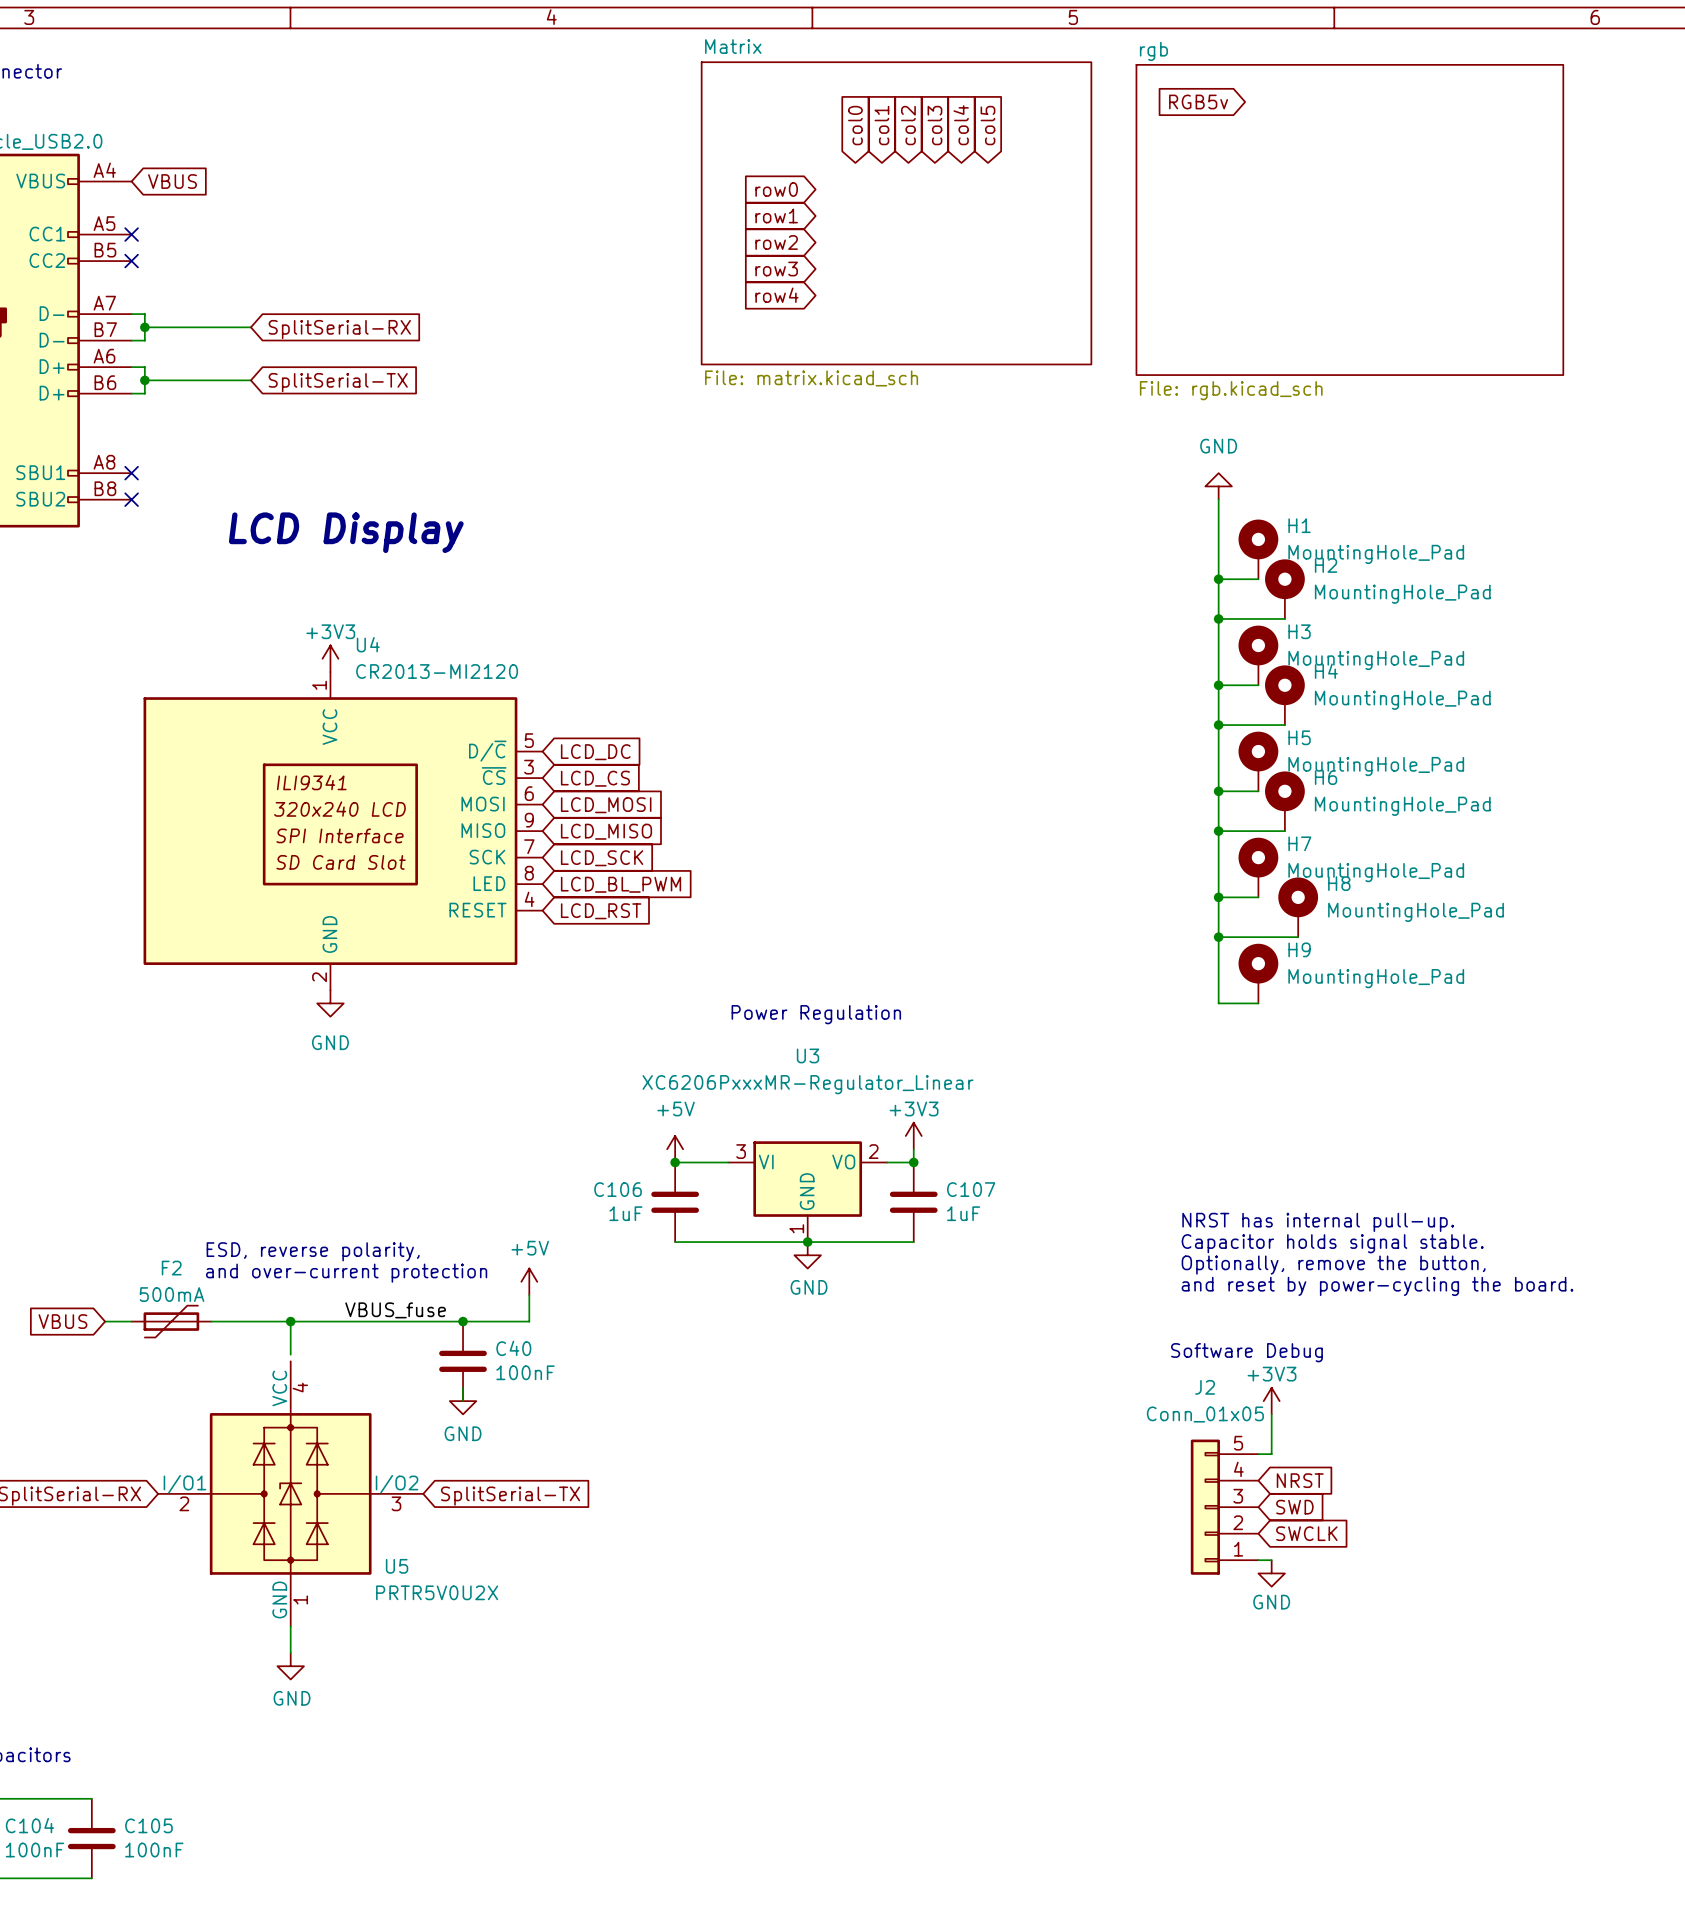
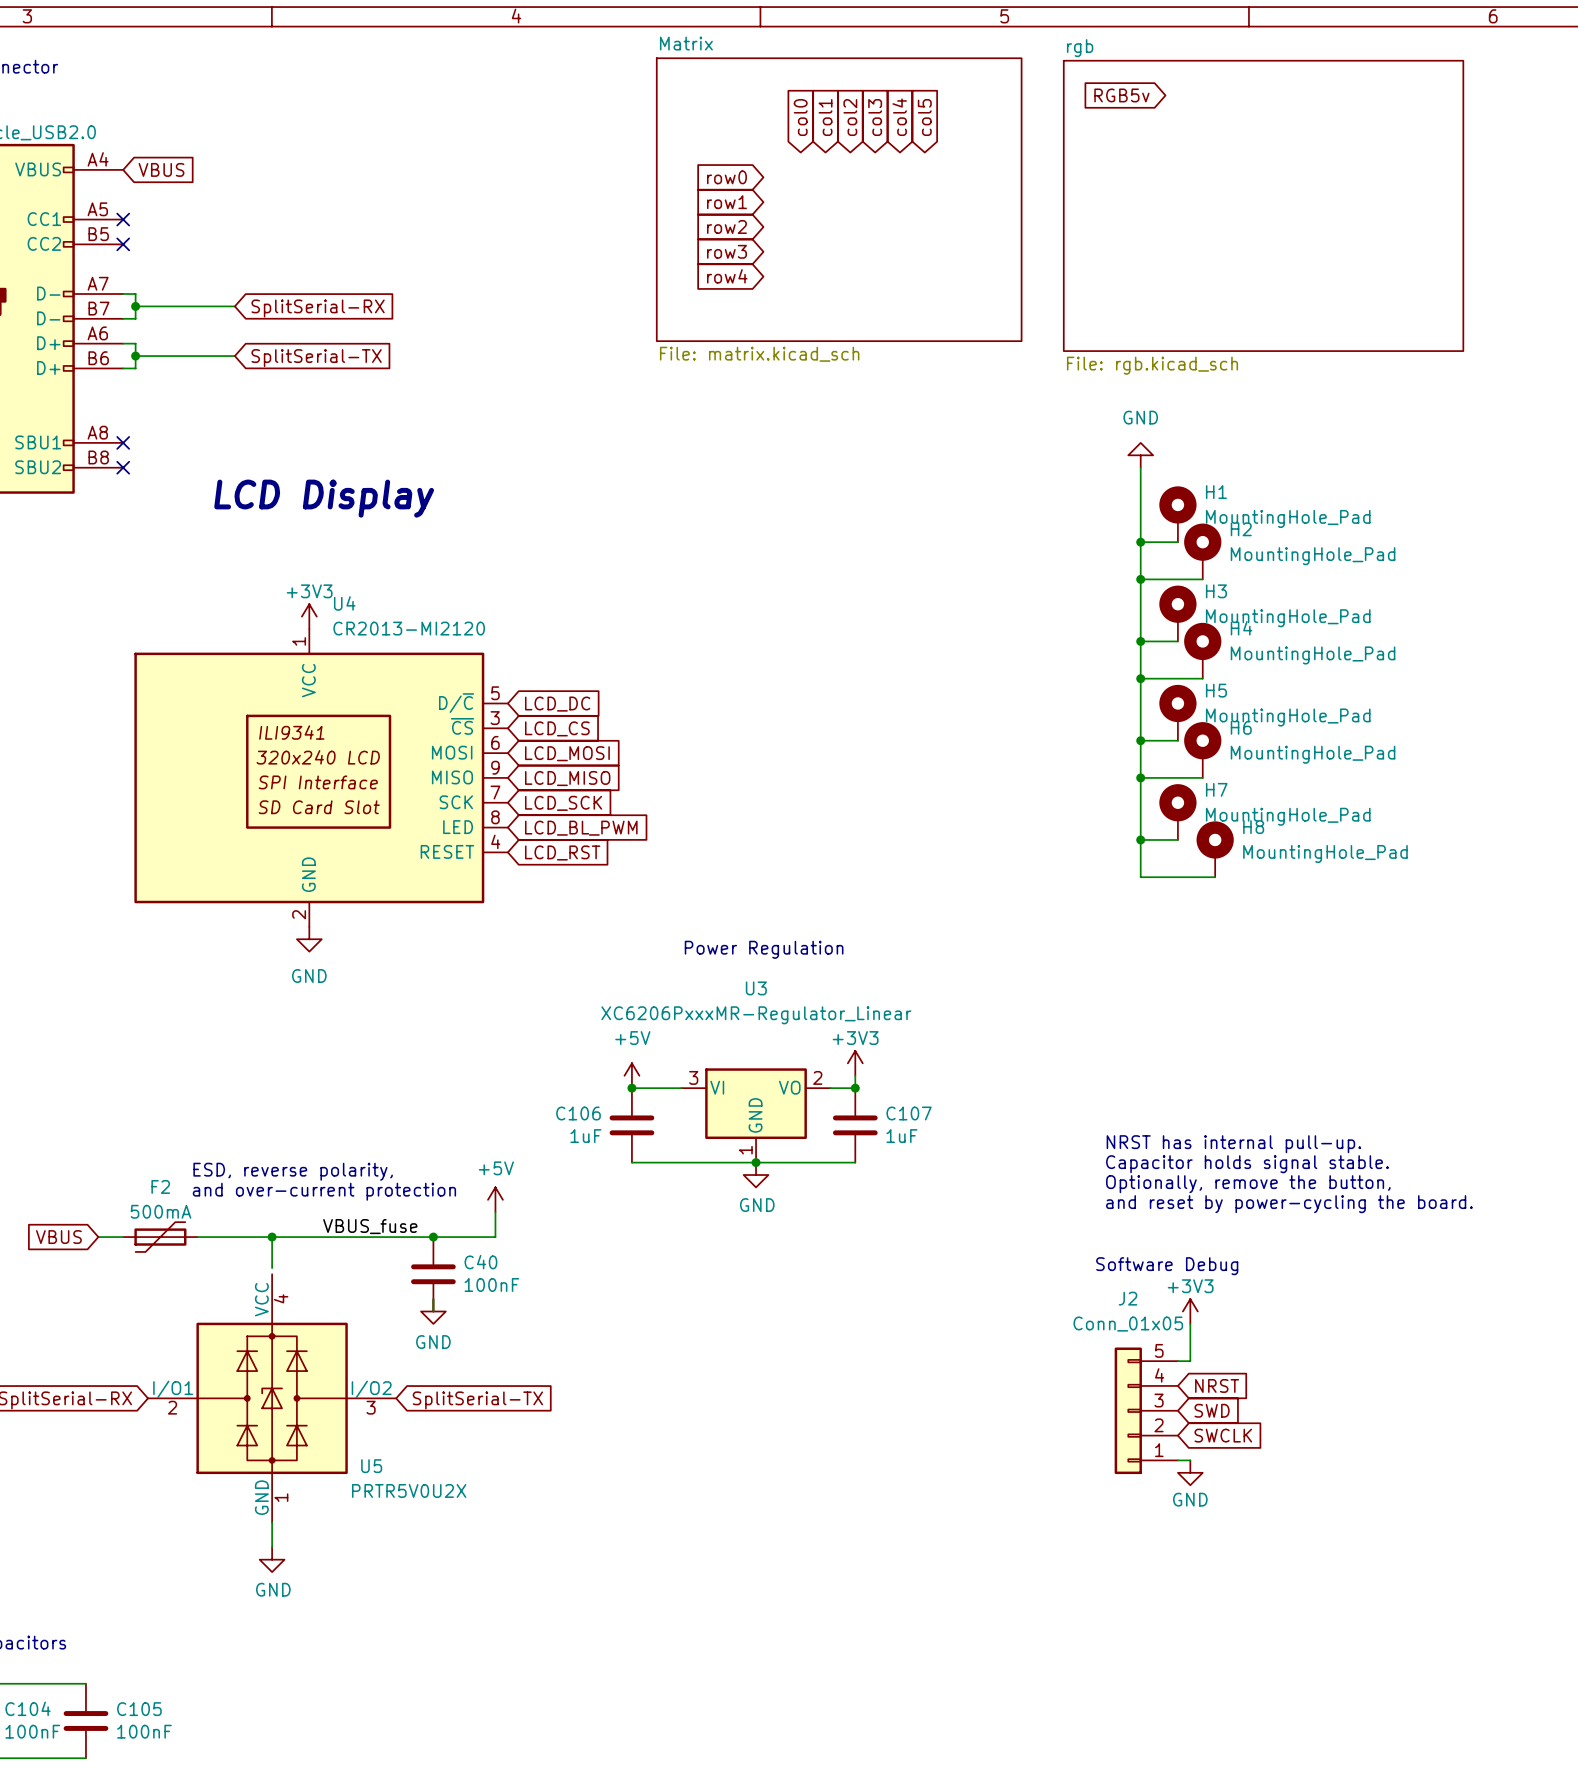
wire: (1218, 937) (1218, 1003) (1258, 1003) -> none
junction: (1218, 937) -> none
H9: MountingHole_Pad (1258, 973) -> none

